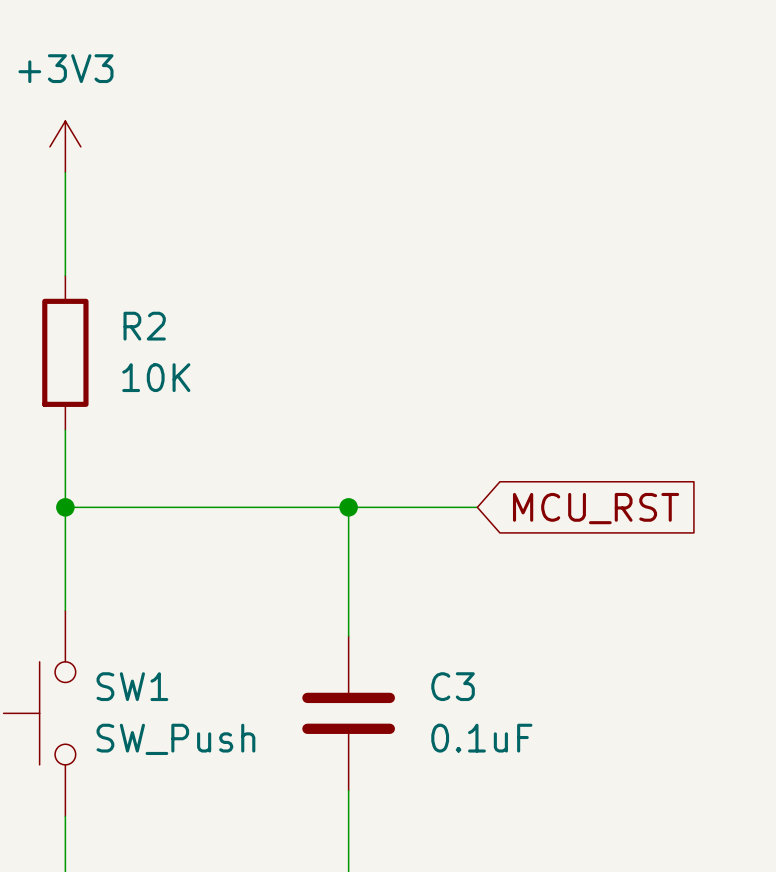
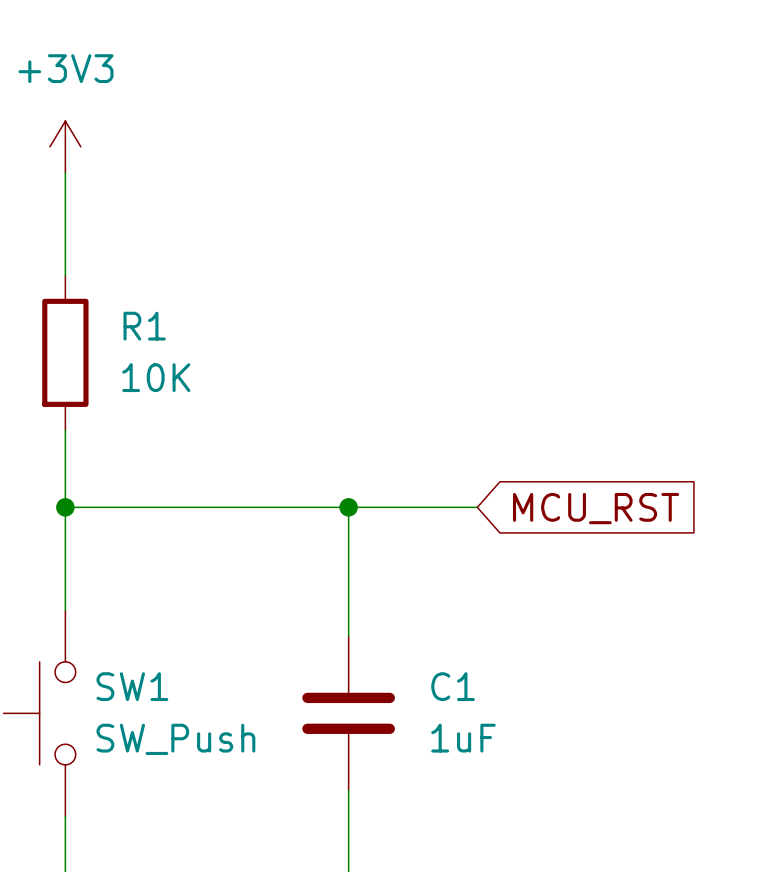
R2 name: R2 (144, 326) -> R1 (144, 326)
C3 name: C3 (453, 686) -> C1 (453, 686)
C3 value: 0.1uF (481, 738) -> 1uF (463, 738)

